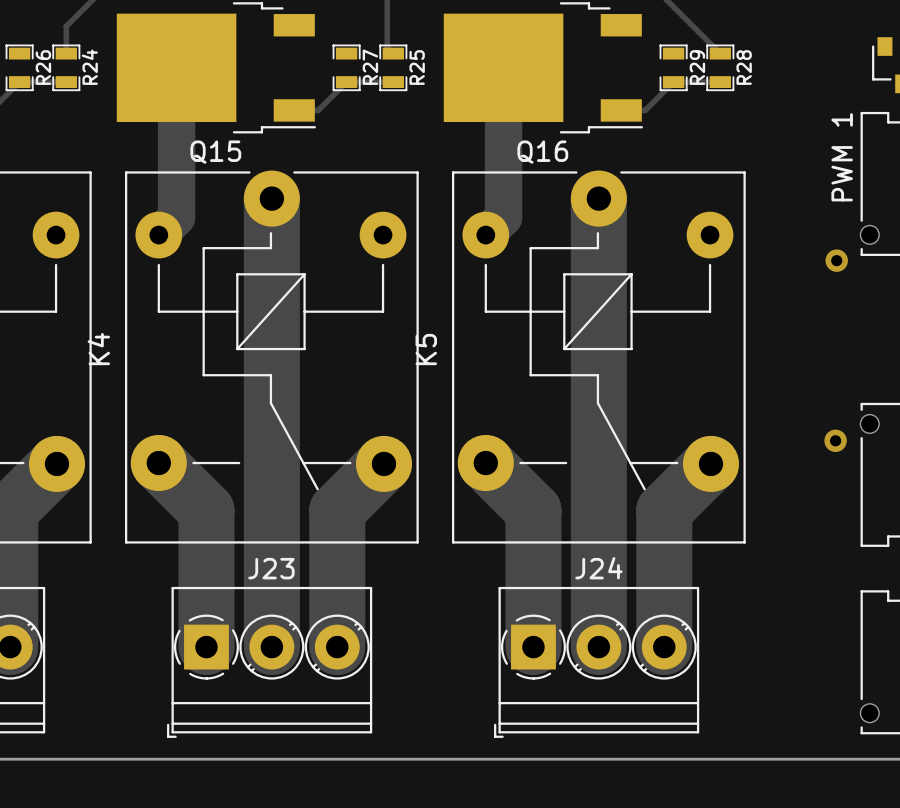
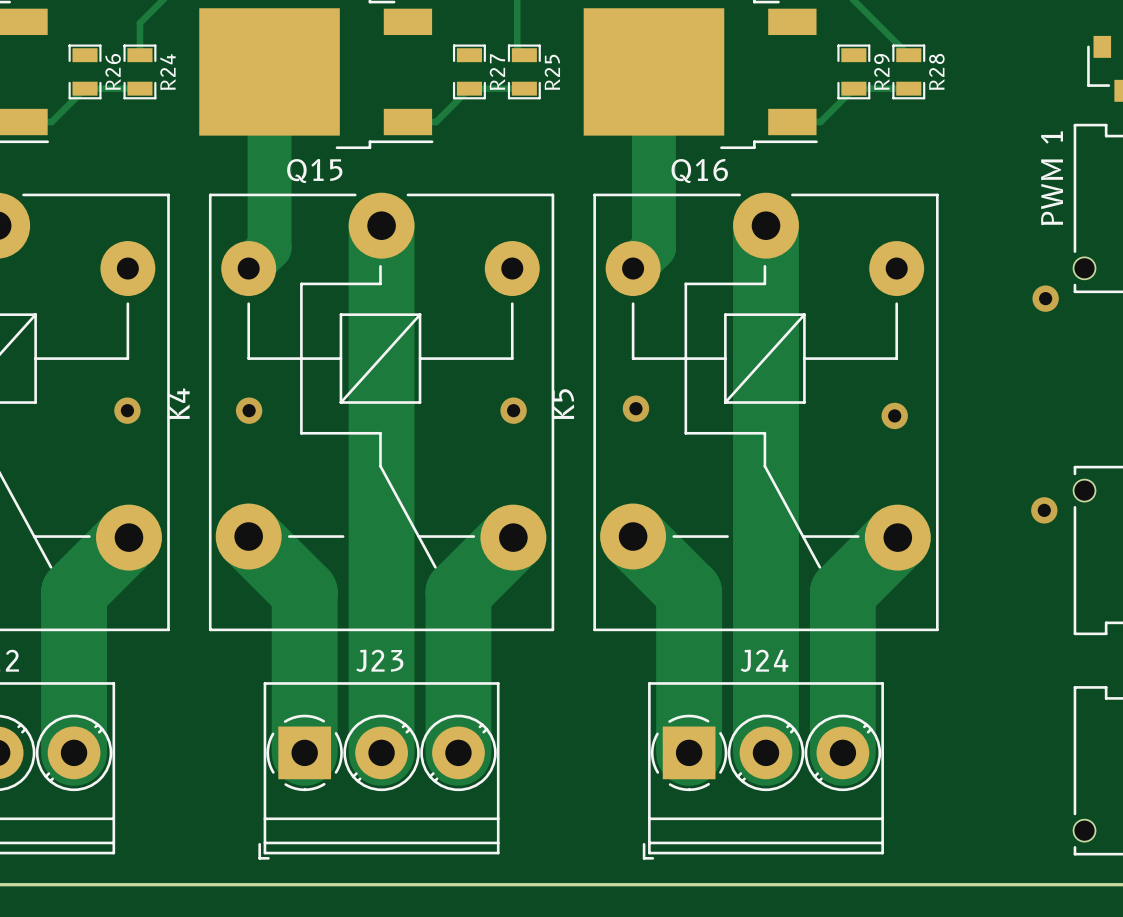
via: none -> (635, 408)
via: none -> (127, 410)
via: none -> (249, 410)
via: none -> (513, 410)
via: none -> (894, 415)

